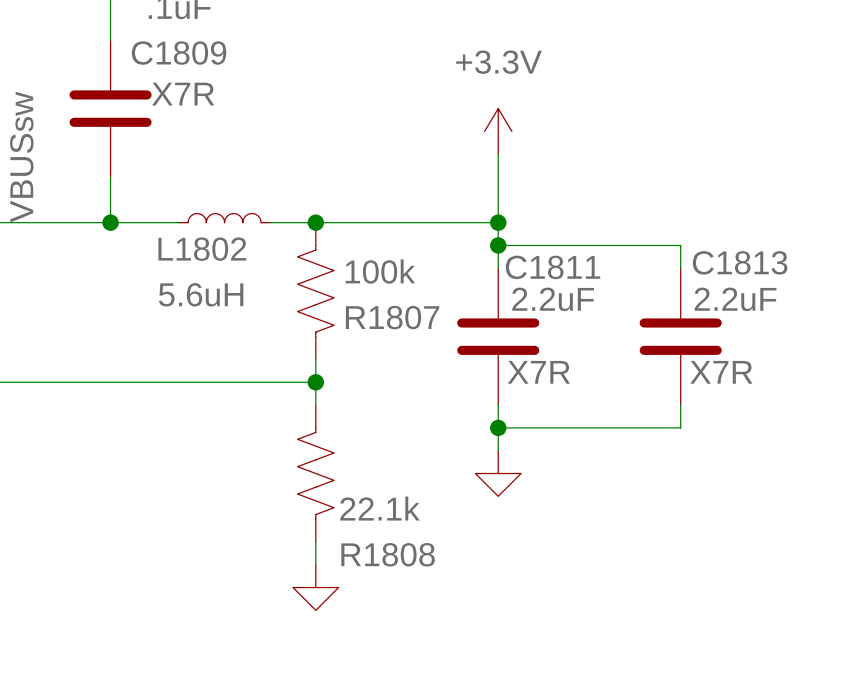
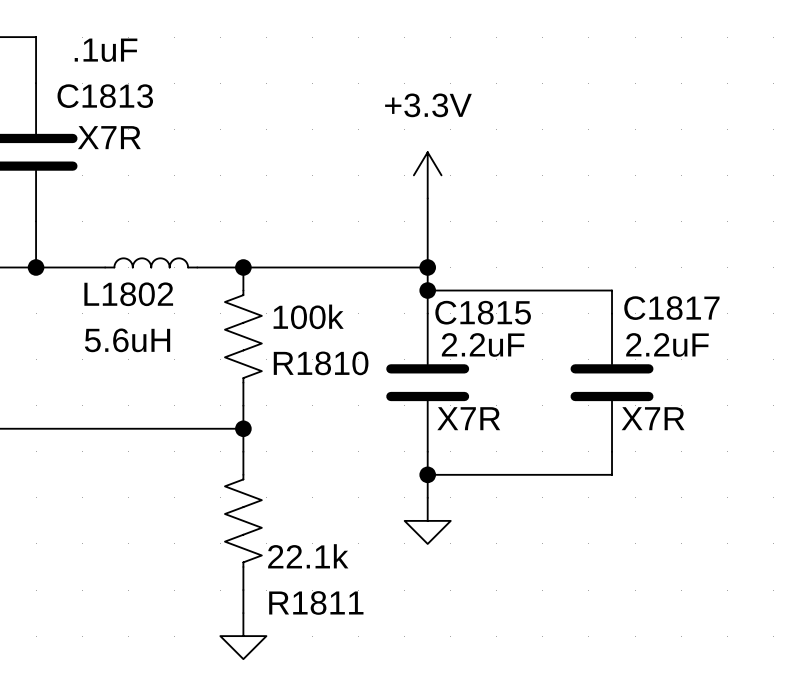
C1809 name: C1809 (179, 53) -> C1813 (105, 96)
C1813 name: C1813 (740, 262) -> C1817 (671, 308)
C1811 name: C1811 (553, 267) -> C1815 (483, 312)
R1807 name: R1807 (392, 317) -> R1810 (321, 363)
R1808 name: R1808 (388, 554) -> R1811 (316, 602)

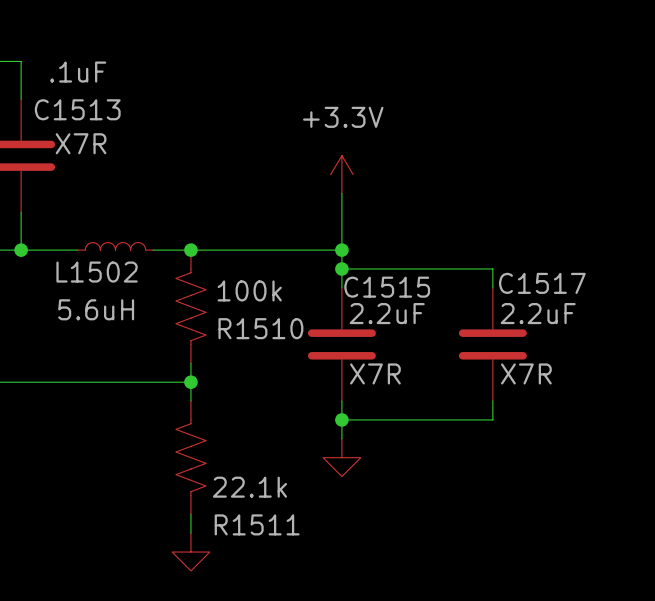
C1813 name: C1813 (105, 96) -> C1513 (77, 109)
L1802 name: L1802 (128, 294) -> L1502 (97, 272)
C1817 name: C1817 (671, 308) -> C1517 (542, 283)
C1815 name: C1815 (483, 312) -> C1515 (387, 287)
R1810 name: R1810 (321, 363) -> R1510 (260, 328)
R1811 name: R1811 (316, 602) -> R1511 (257, 524)

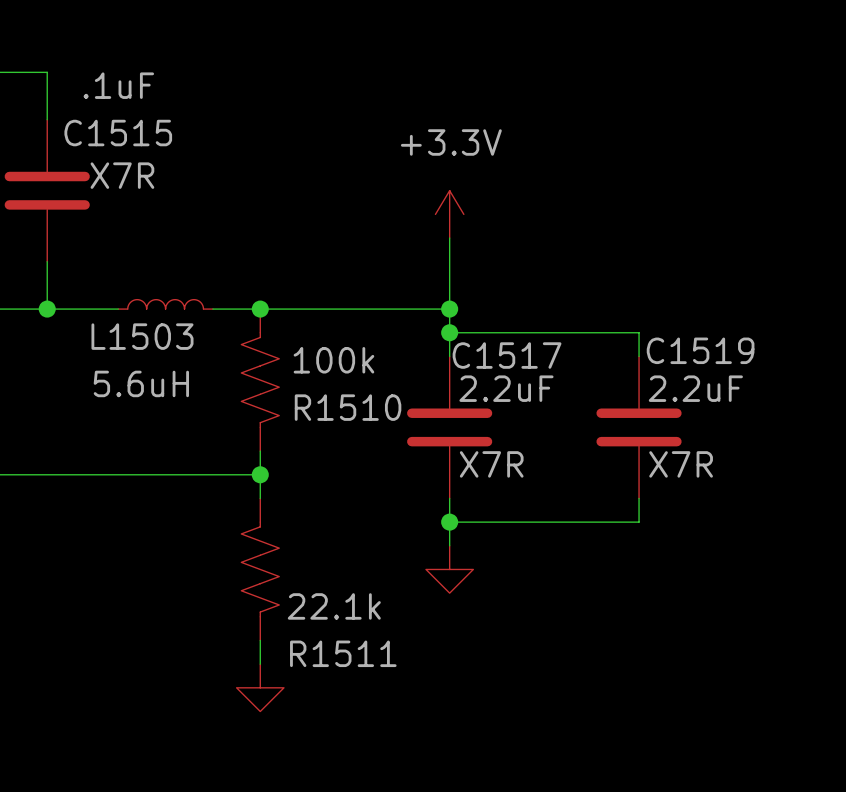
C1513 name: C1513 (77, 109) -> C1515 (118, 133)
L1502 name: L1502 (97, 272) -> L1503 (142, 336)
C1517 name: C1517 (542, 283) -> C1519 (700, 350)
C1515 name: C1515 (387, 287) -> C1517 (507, 355)

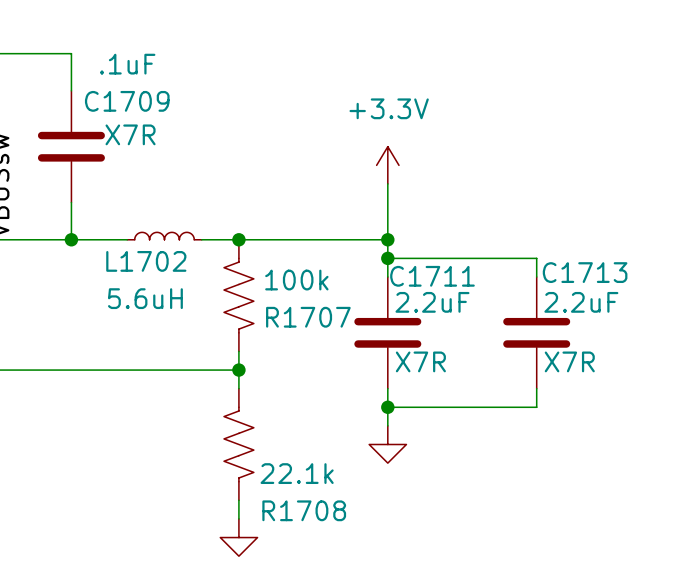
C1515 name: C1515 (118, 133) -> C1709 (127, 101)
L1503 name: L1503 (142, 336) -> L1702 (146, 261)
C1519 name: C1519 (700, 350) -> C1713 (585, 272)
C1517 name: C1517 (507, 355) -> C1711 (432, 276)
R1510 name: R1510 (348, 407) -> R1707 (308, 317)
R1511 name: R1511 (343, 653) -> R1708 (304, 510)

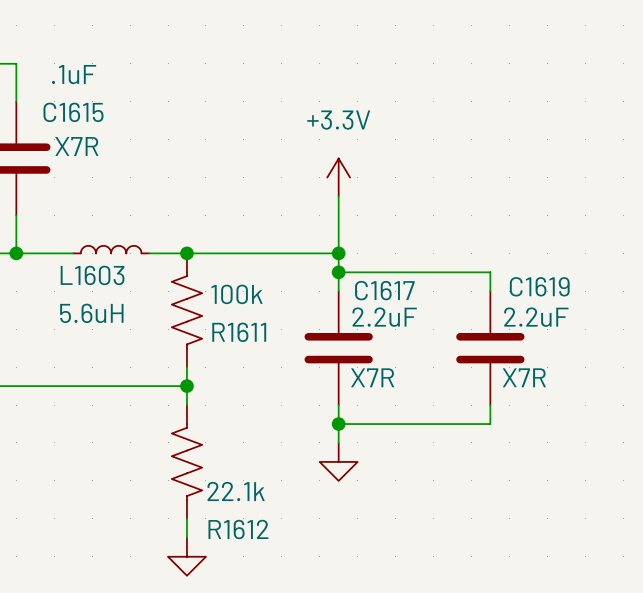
C1709 name: C1709 (127, 101) -> C1615 (73, 112)
L1702 name: L1702 (146, 261) -> L1603 (92, 275)
C1713 name: C1713 (585, 272) -> C1619 (539, 286)
C1711 name: C1711 (432, 276) -> C1617 (384, 290)
R1707 name: R1707 (308, 317) -> R1611 (239, 332)
R1708 name: R1708 (304, 510) -> R1612 (238, 529)

